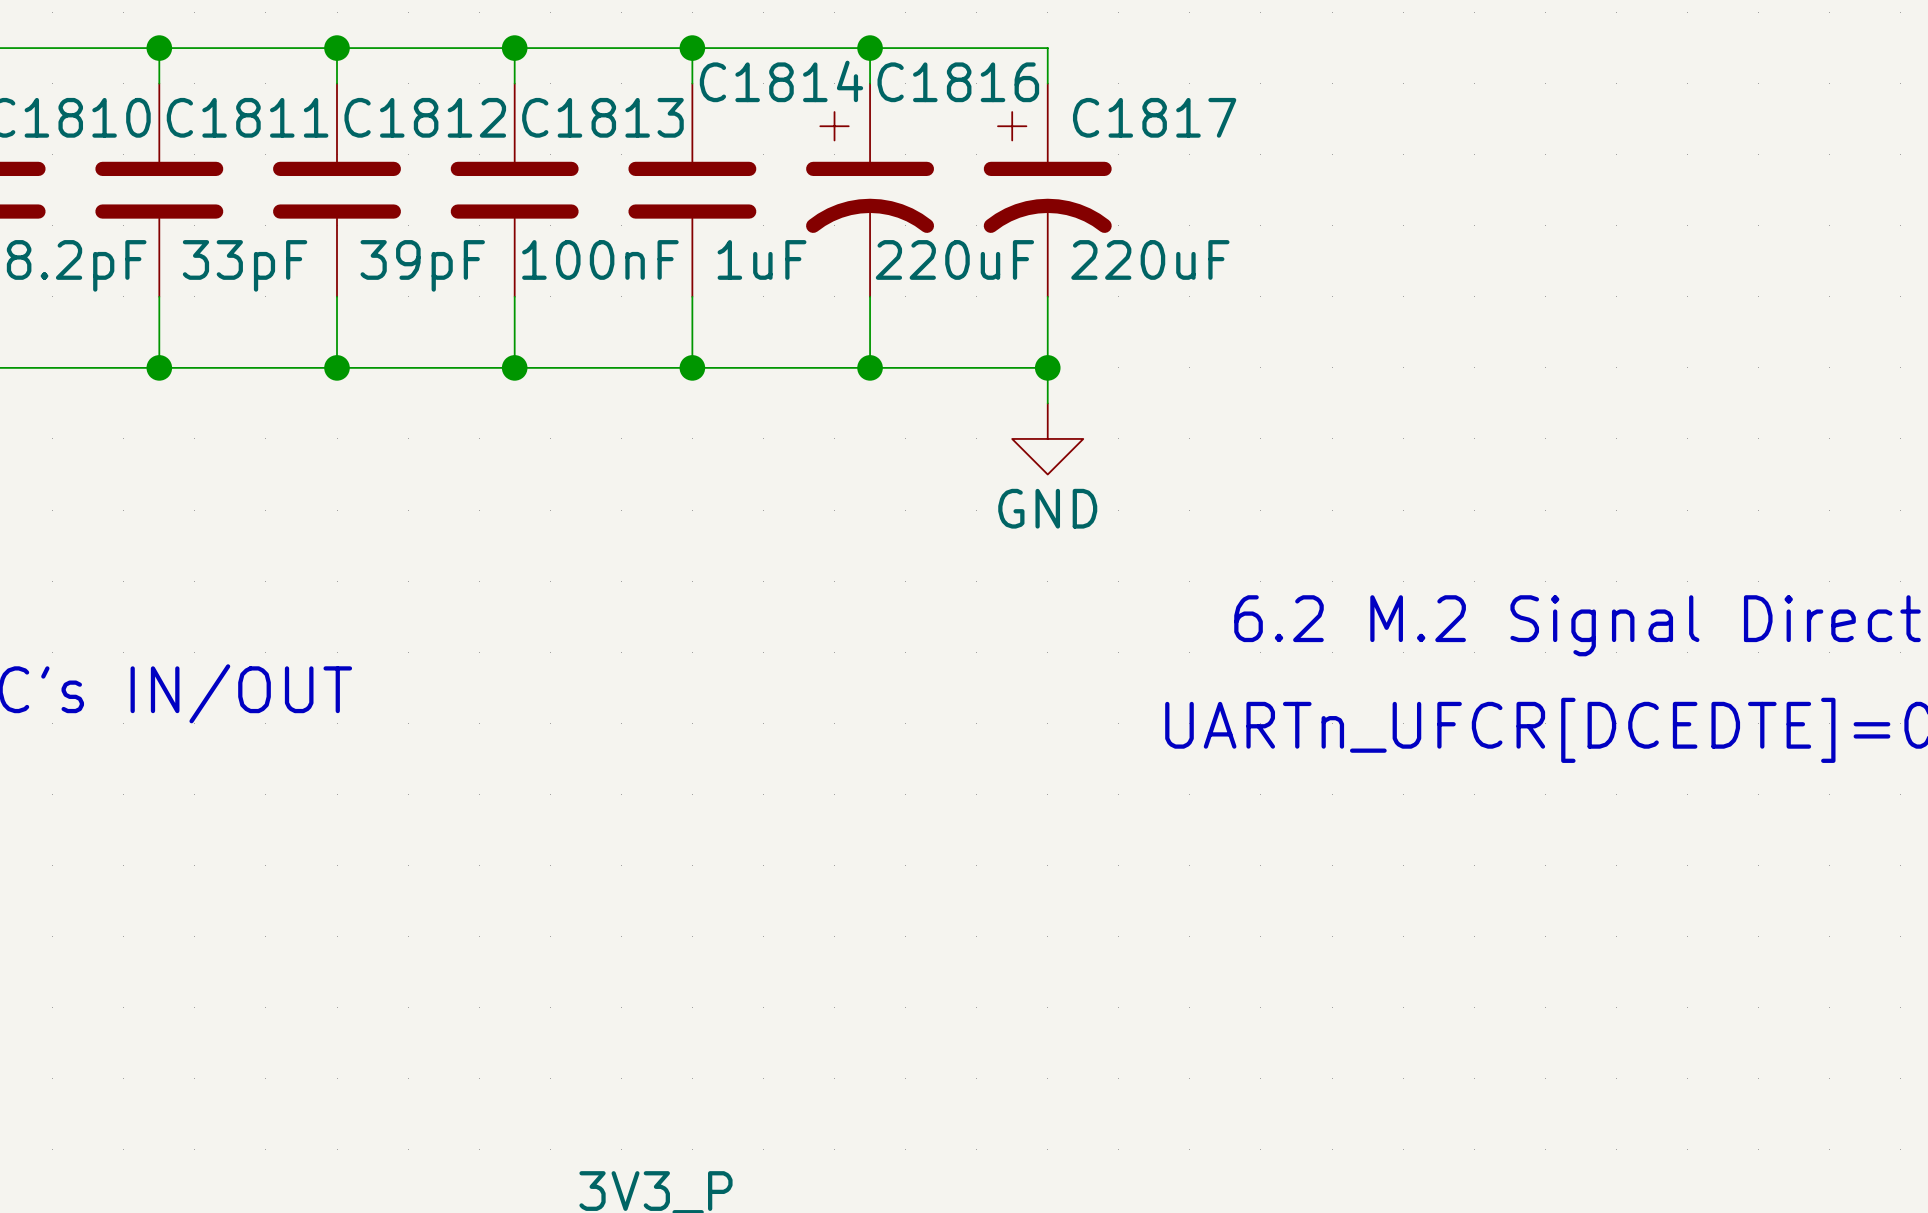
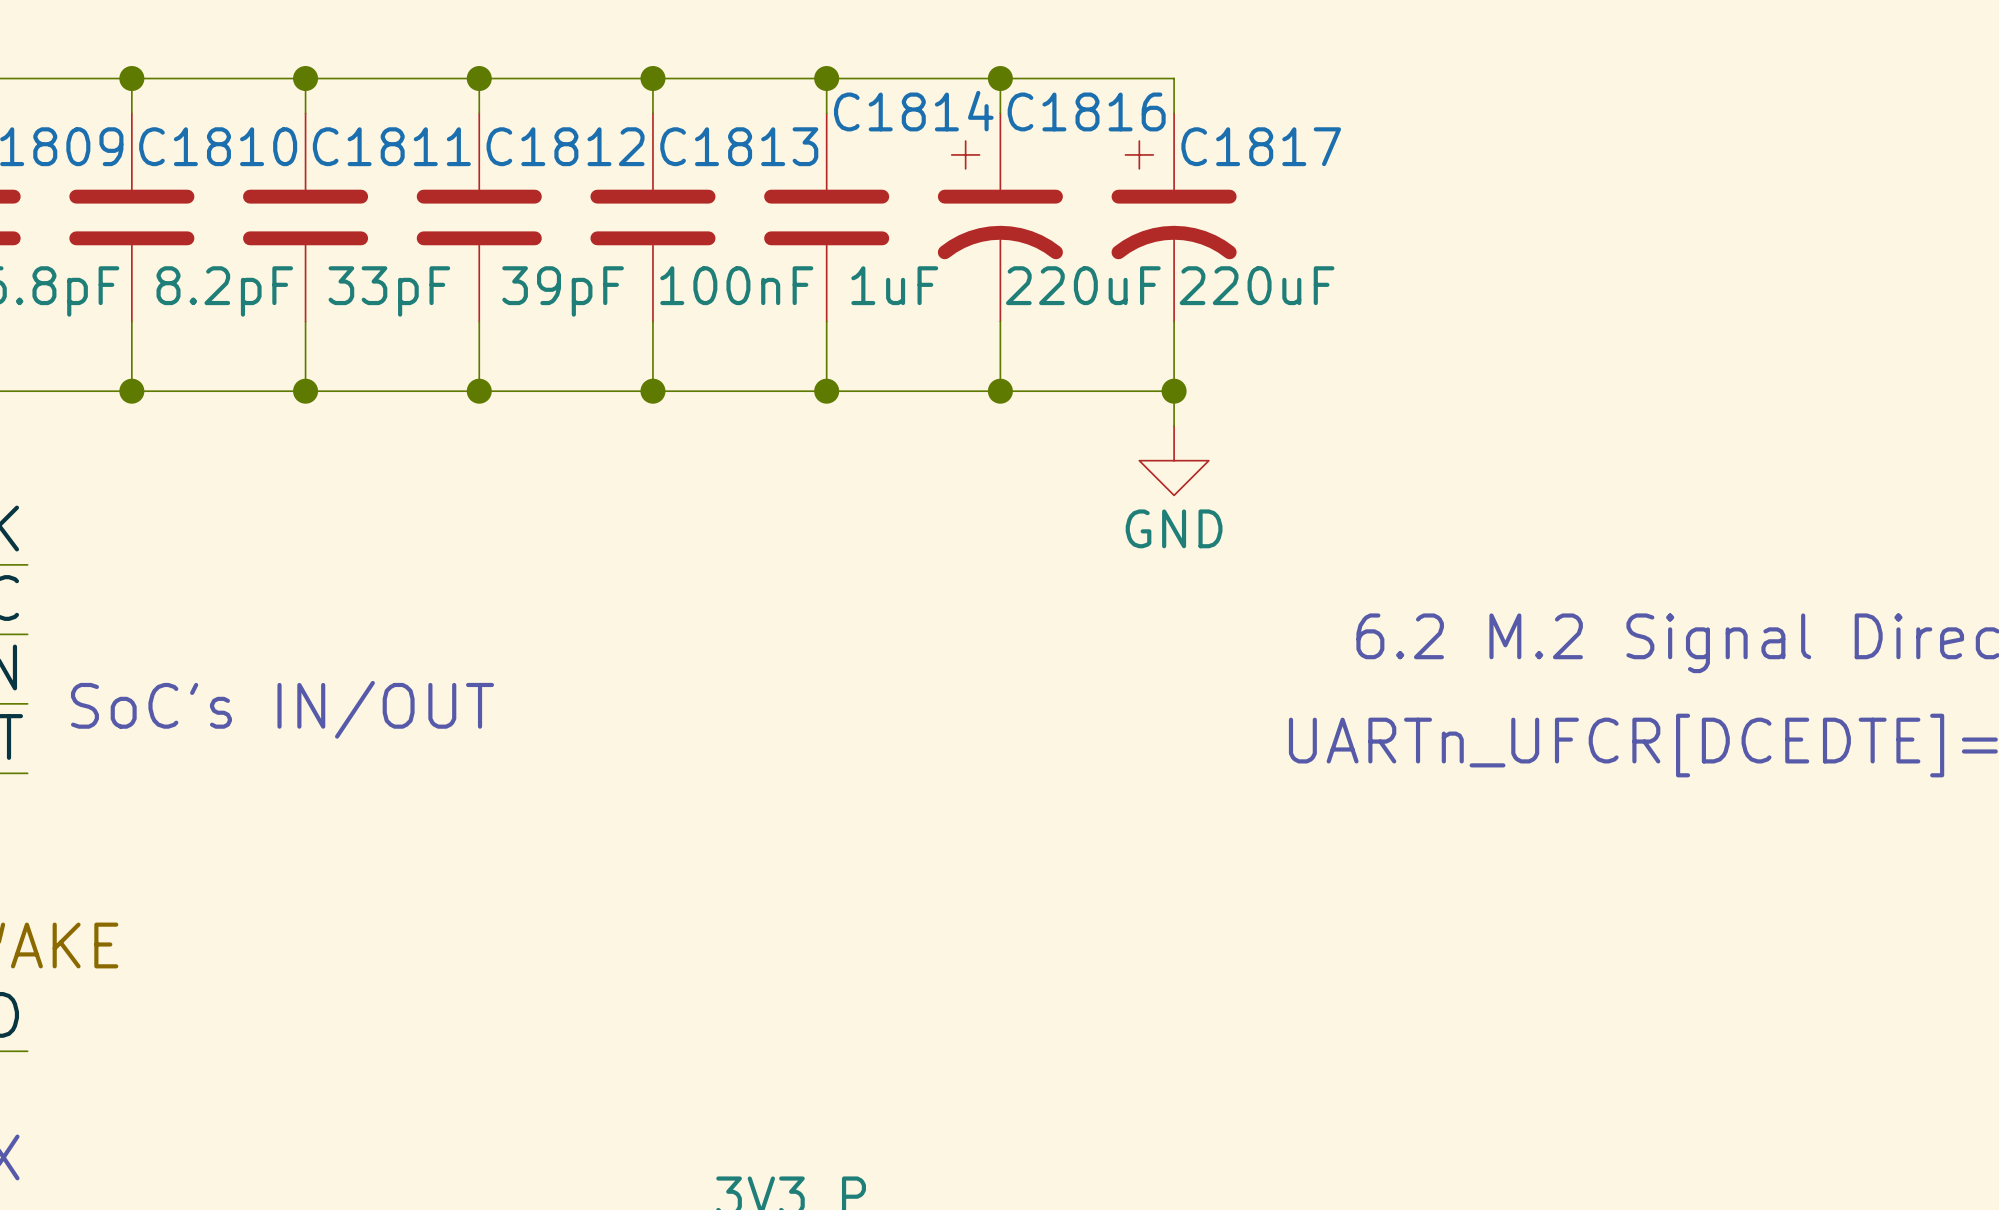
C1817 name position: C1817 (1154, 117) -> C1817 (1261, 146)
C1817 value position: 220uF (1150, 259) -> 220uF (1257, 285)

